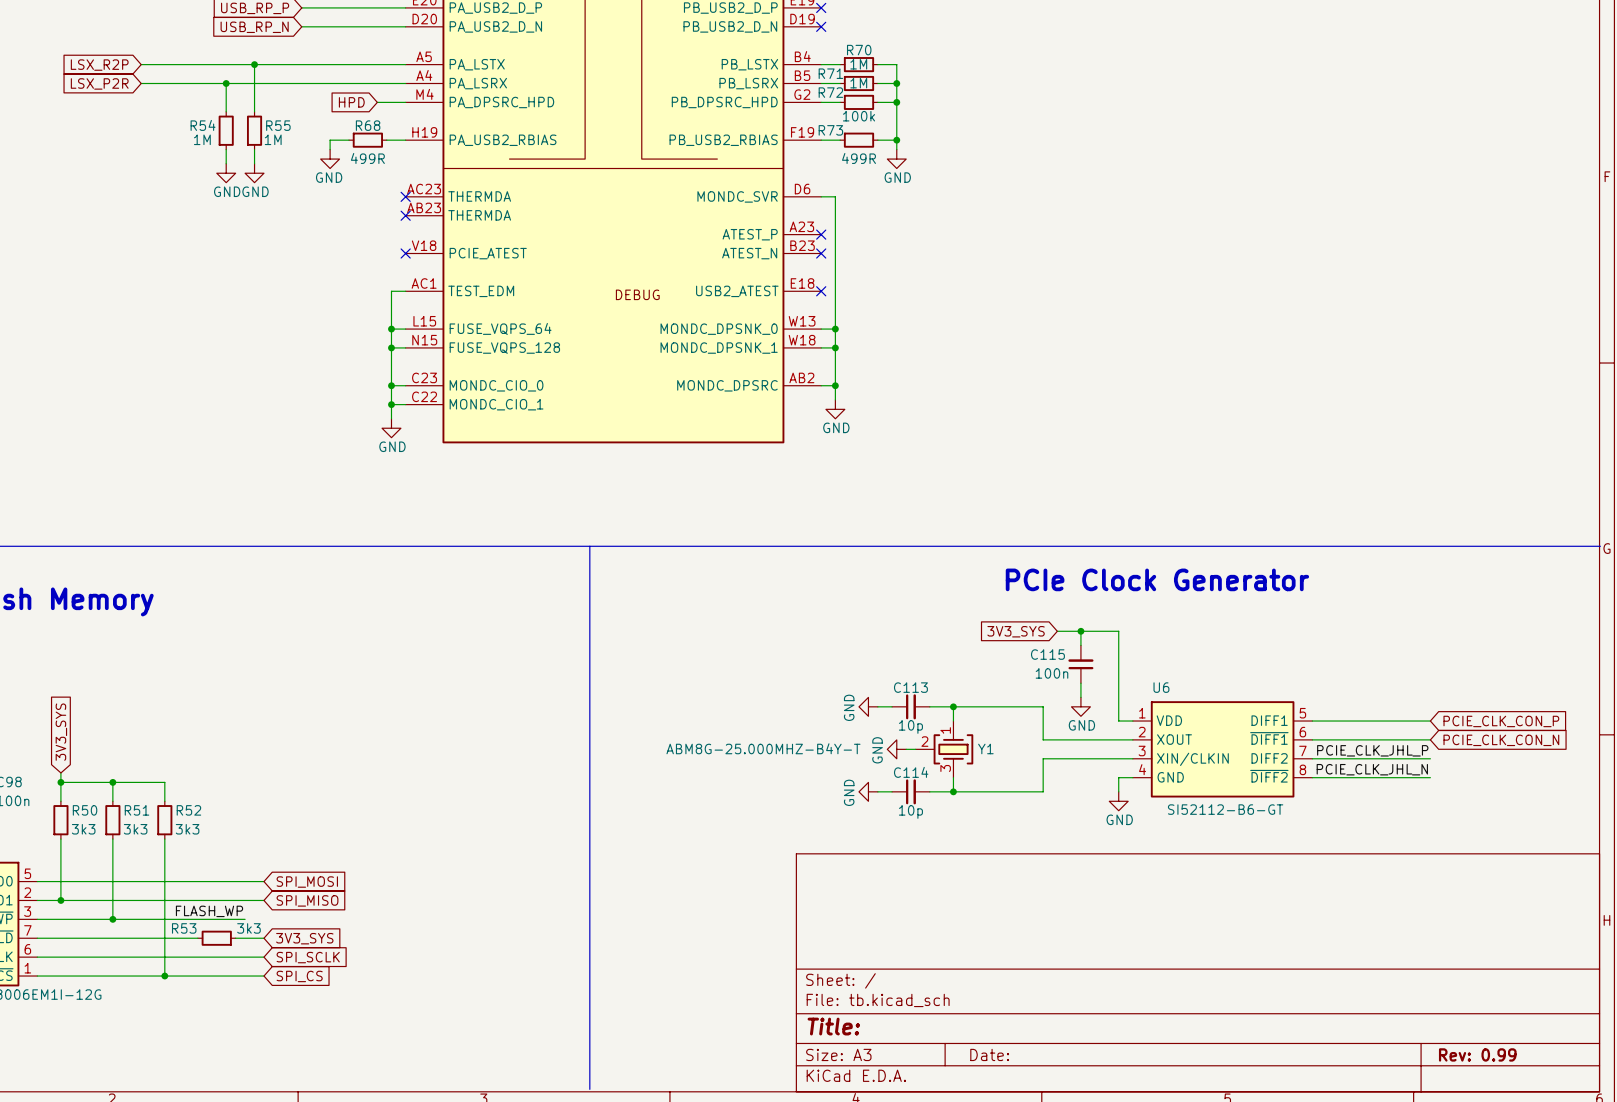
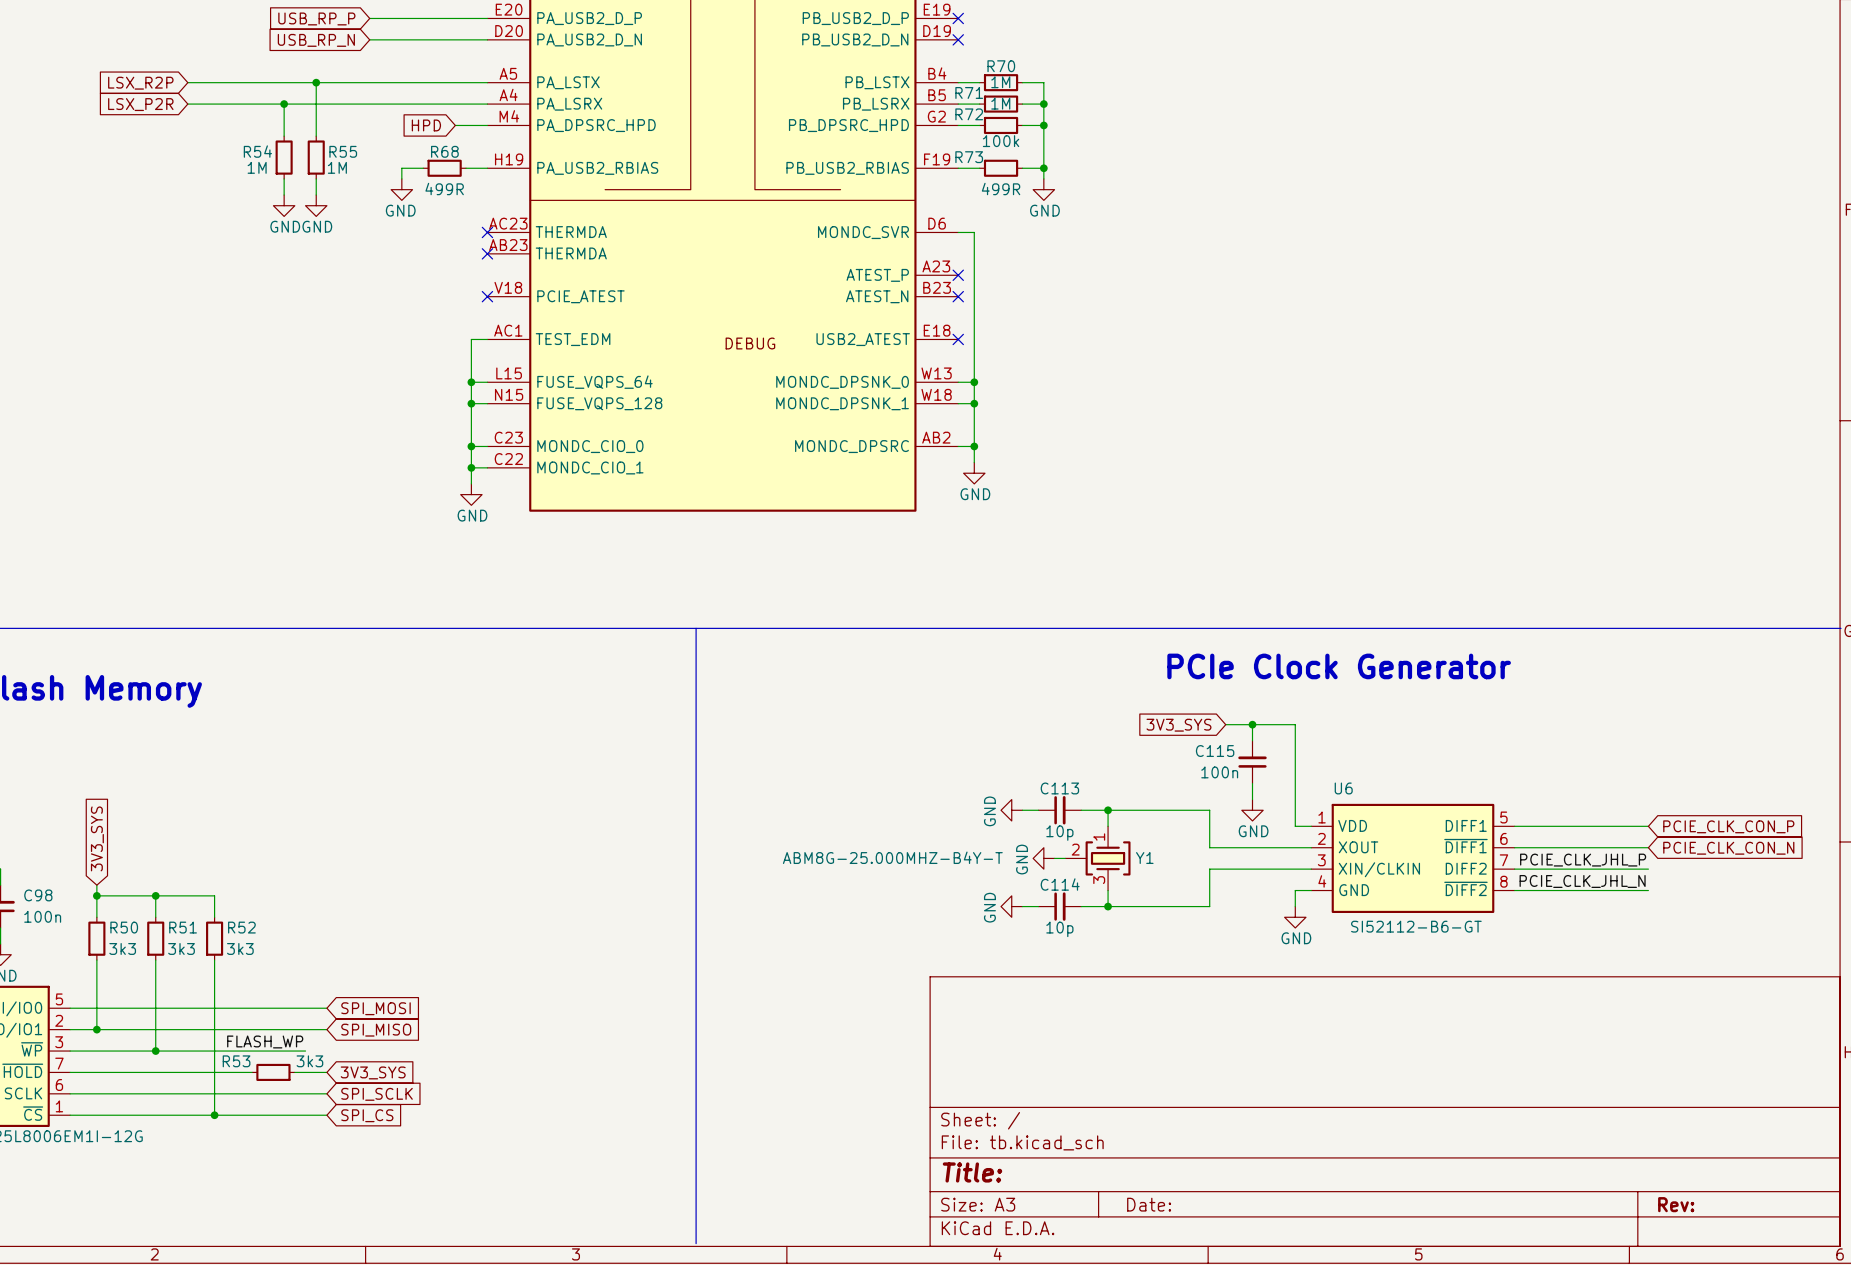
title block: Rev: 0.99 (1477, 1054) -> Rev: (1676, 1204)

